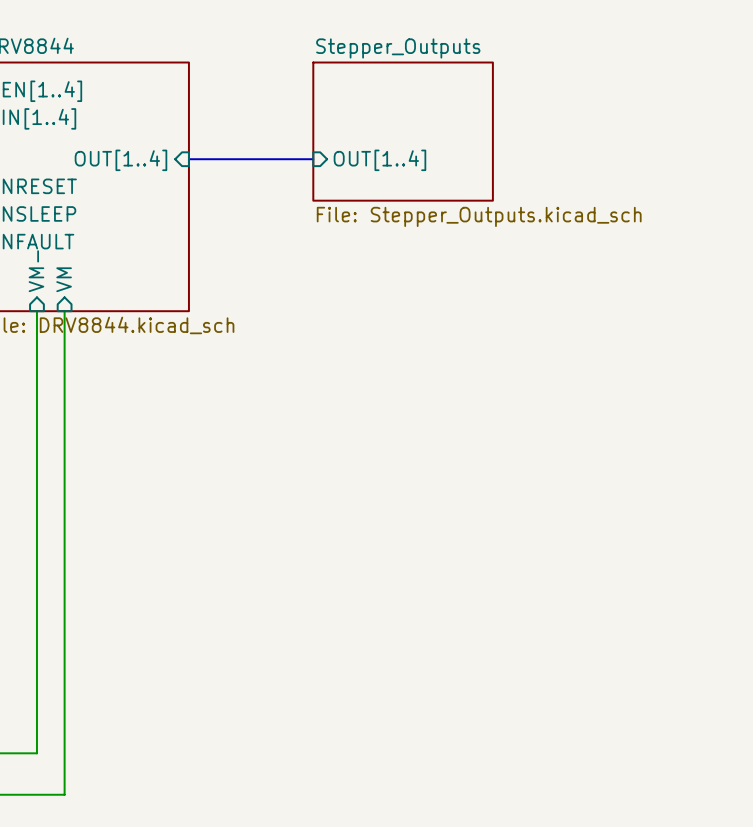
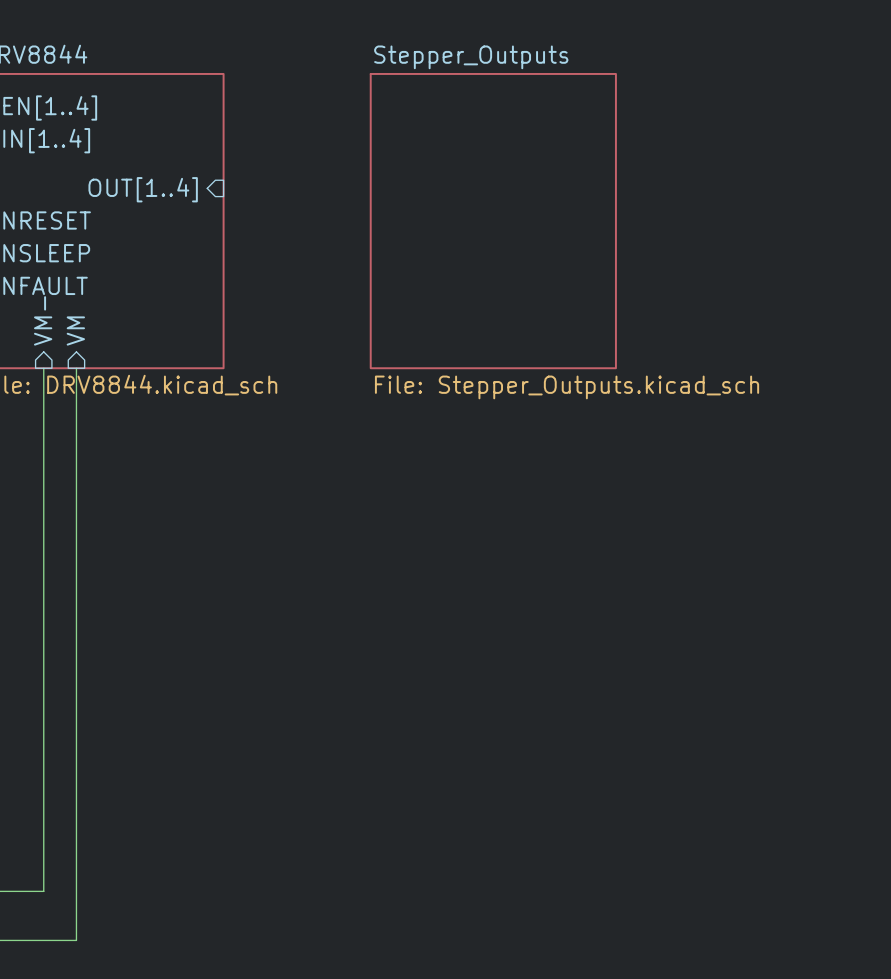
sheet Stepper_Outputs: File: Stepper_Outputs.kicad_sch (403, 131) -> none
bus: (188, 159) (313, 159) -> none
sheet pin: OUT[1..4] (379, 160) -> none
sheet Stepper_Outputs: none -> File: Stepper_Outputs.kicad_sch (493, 221)

